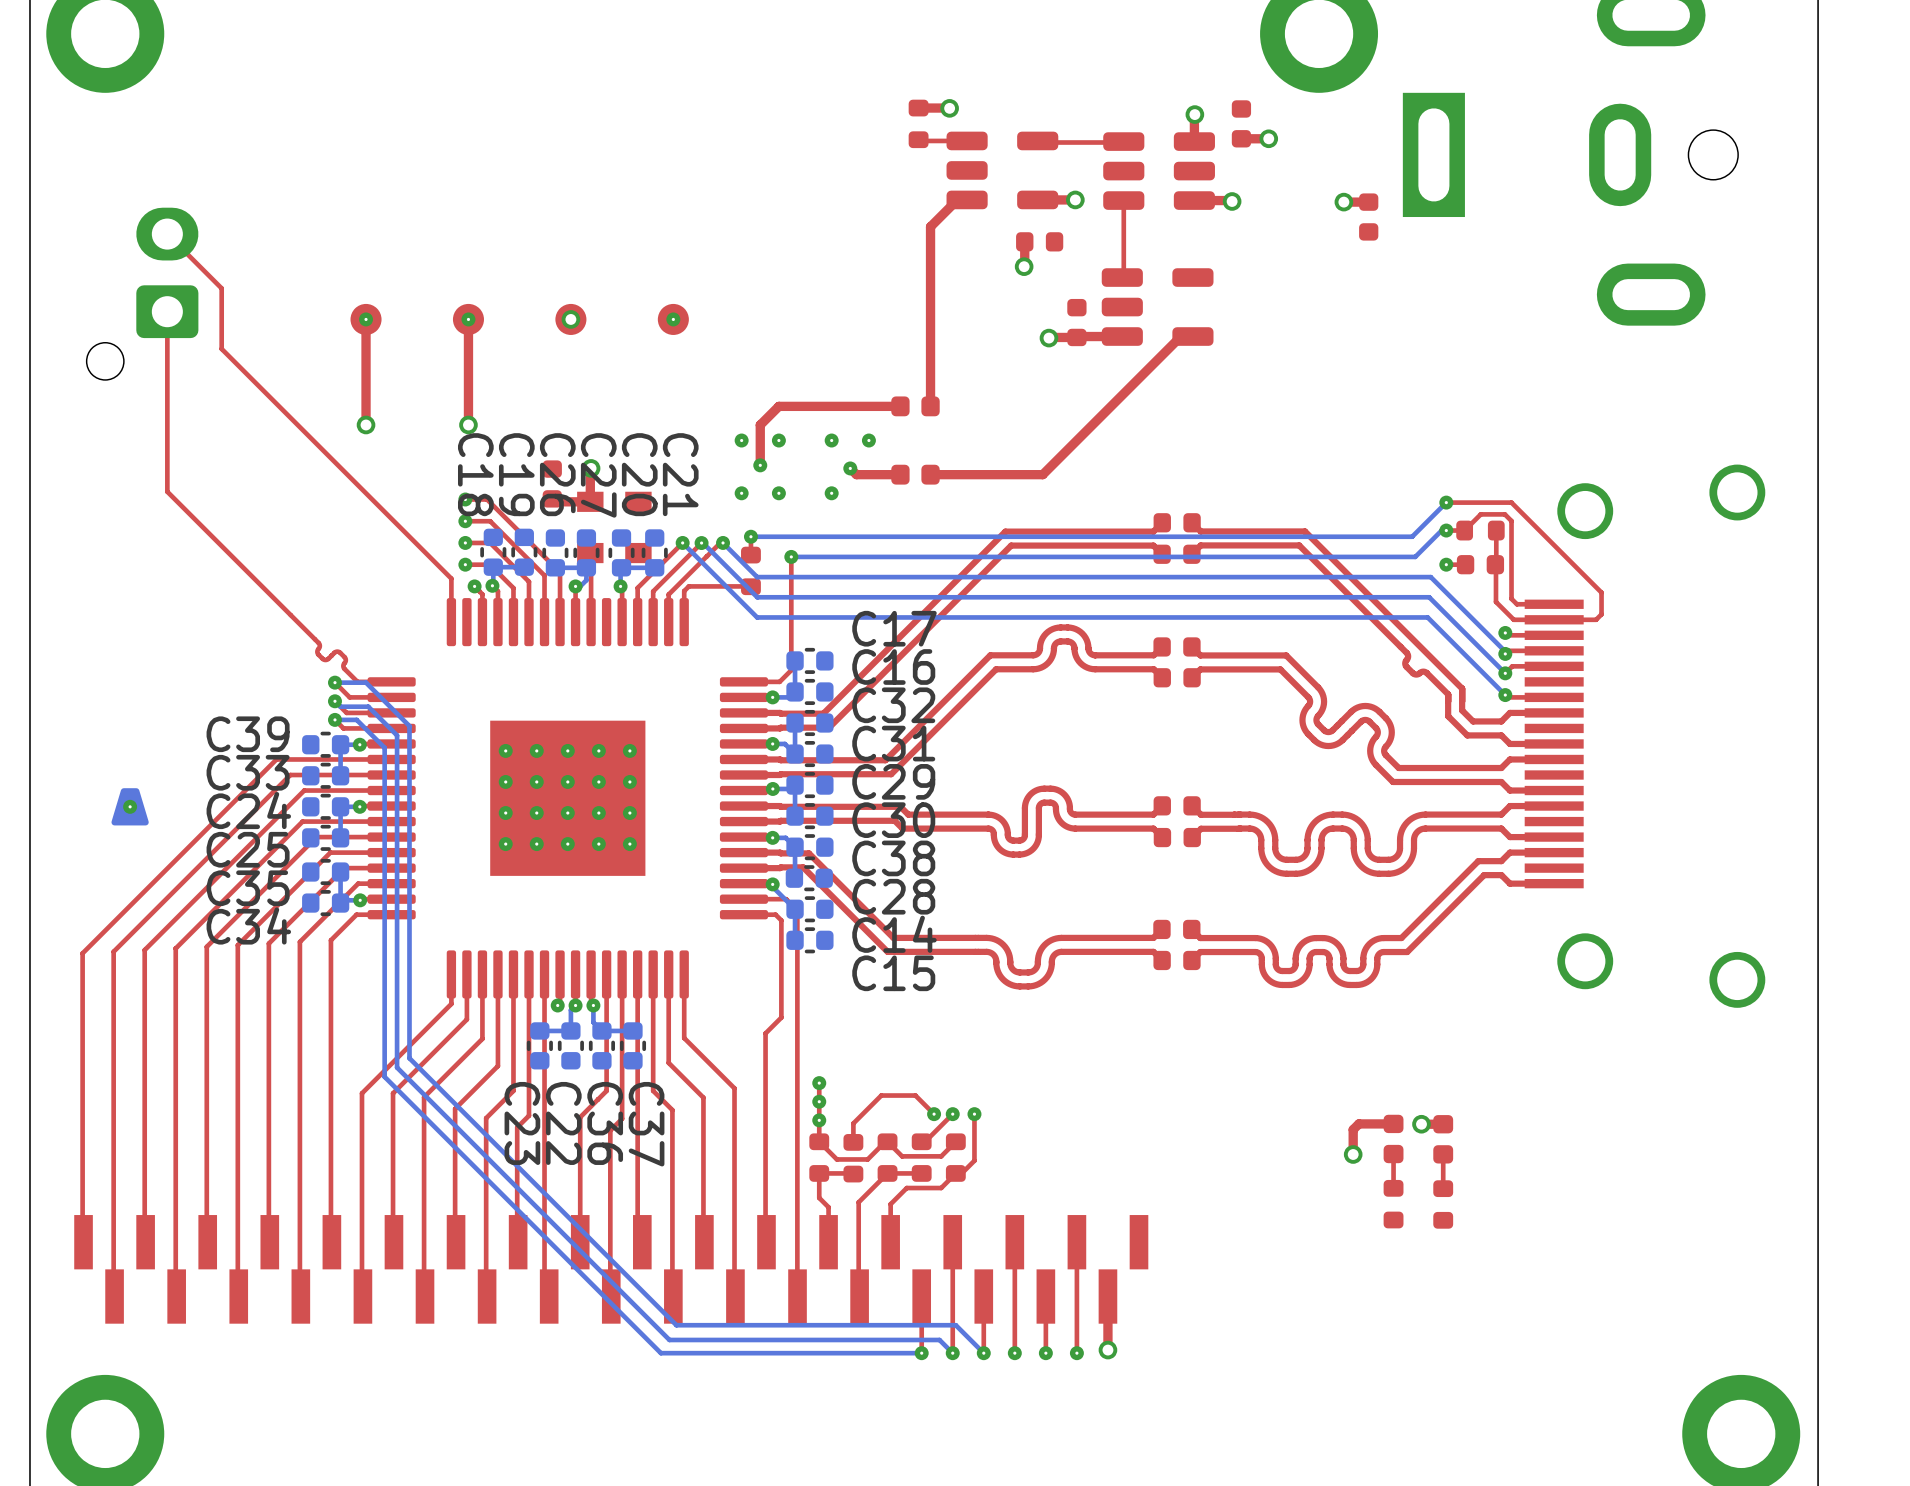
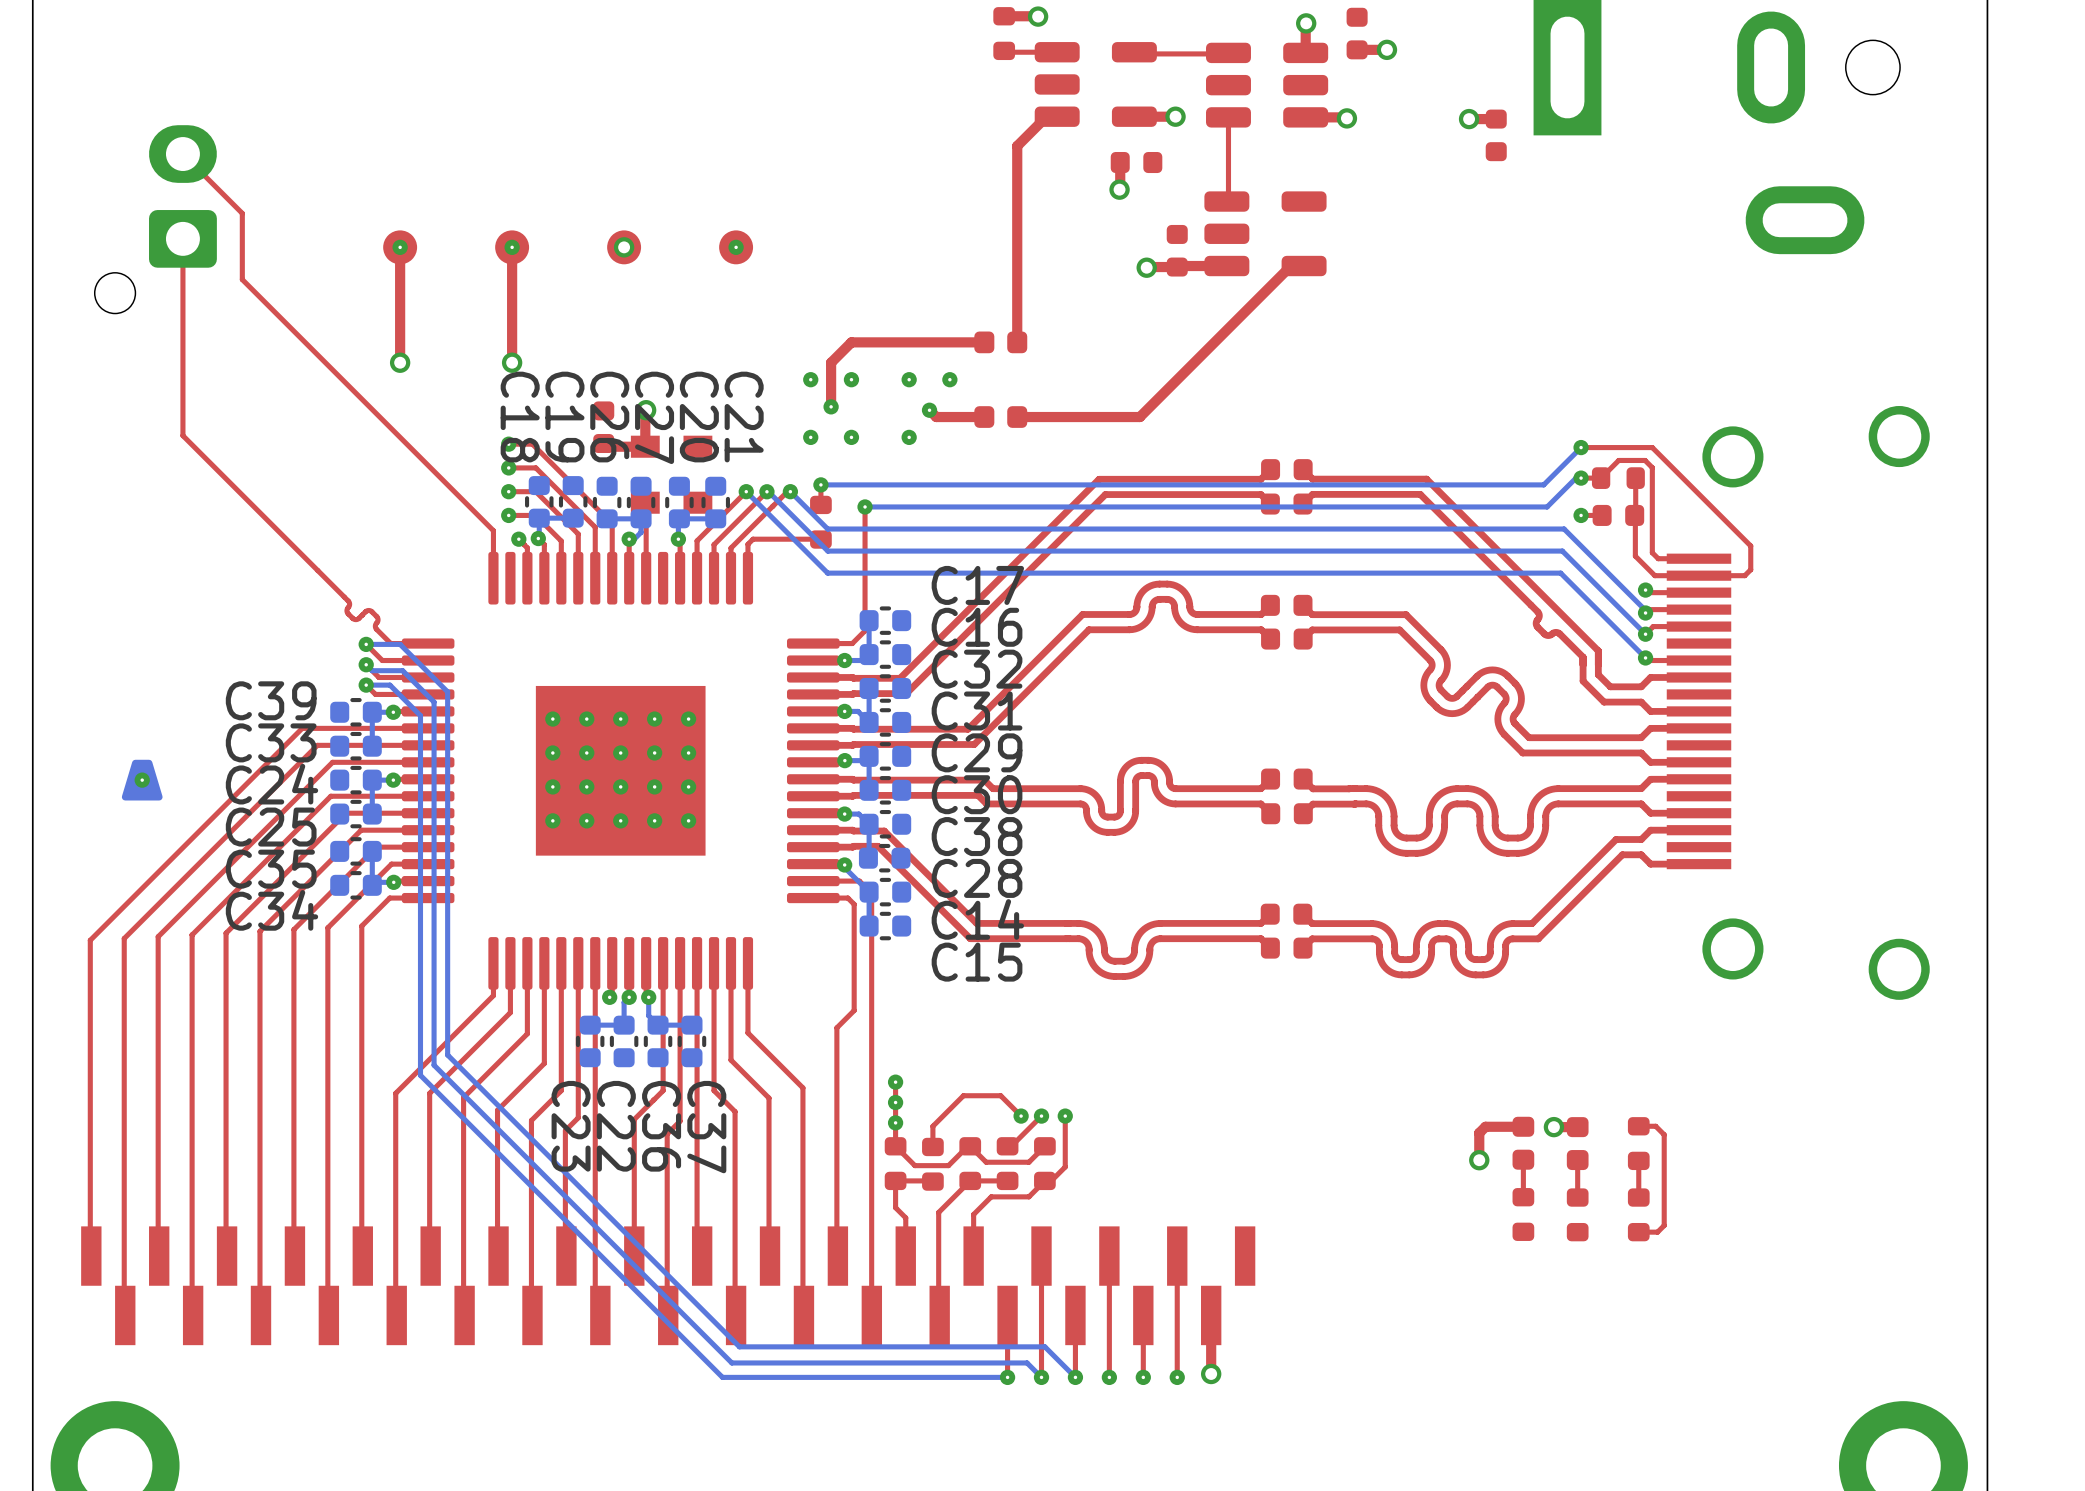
top track: none -> (1638, 1126) (1655, 1126) (1664, 1134) (1664, 1225) (1657, 1232) (1638, 1232)
part: none -> (1638, 1143)
top track: none -> (1638, 1160) (1638, 1197)
part: none -> (1638, 1214)

